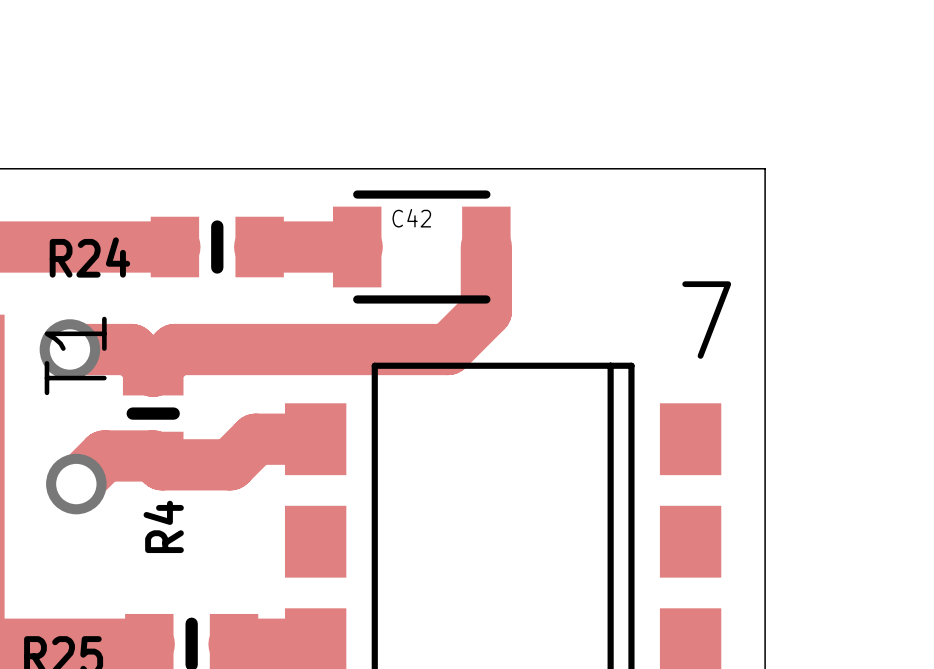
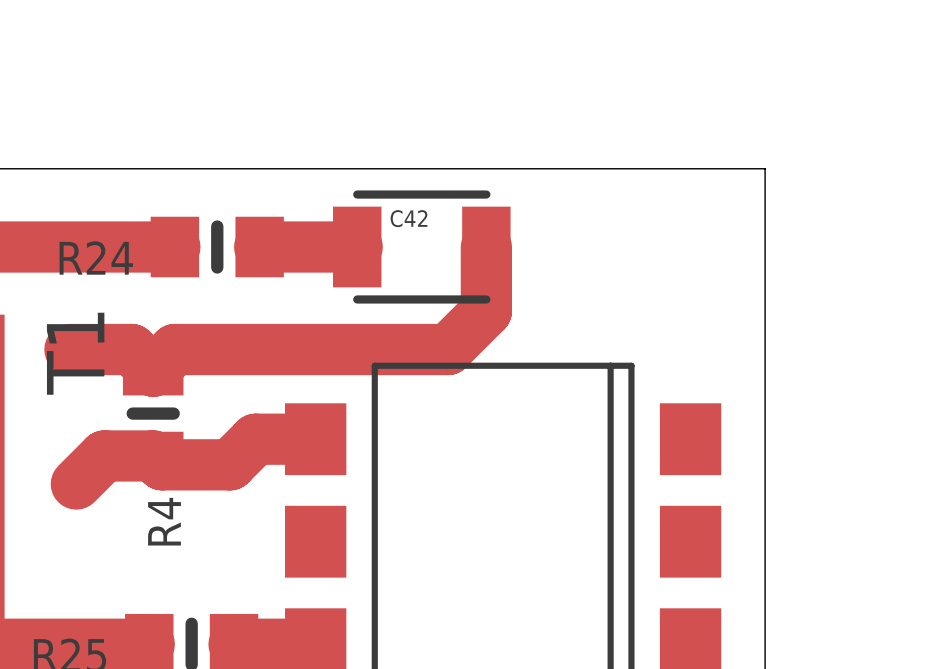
text: 7 (706, 320) -> none
via: (69, 349) -> none
via: (76, 484) -> none

